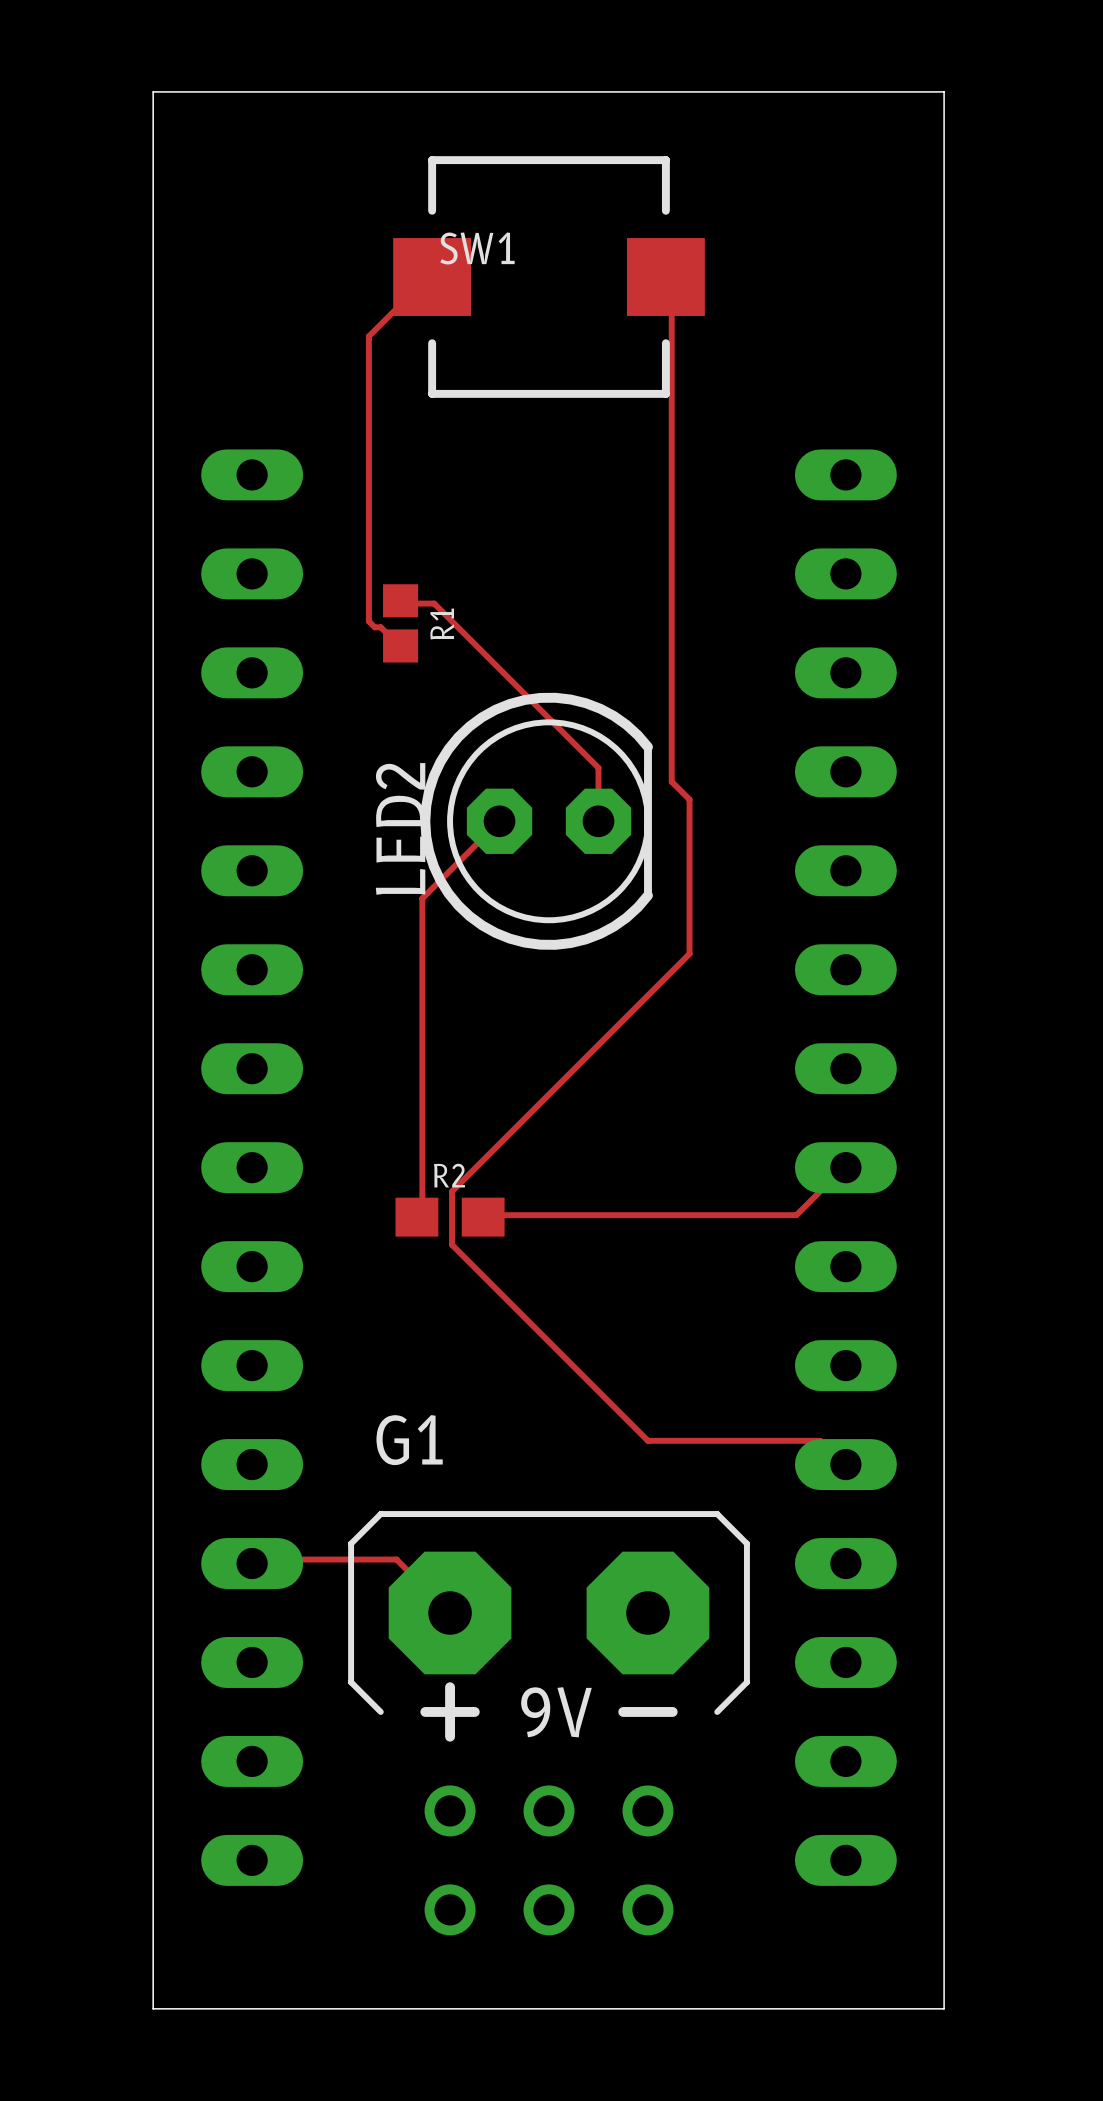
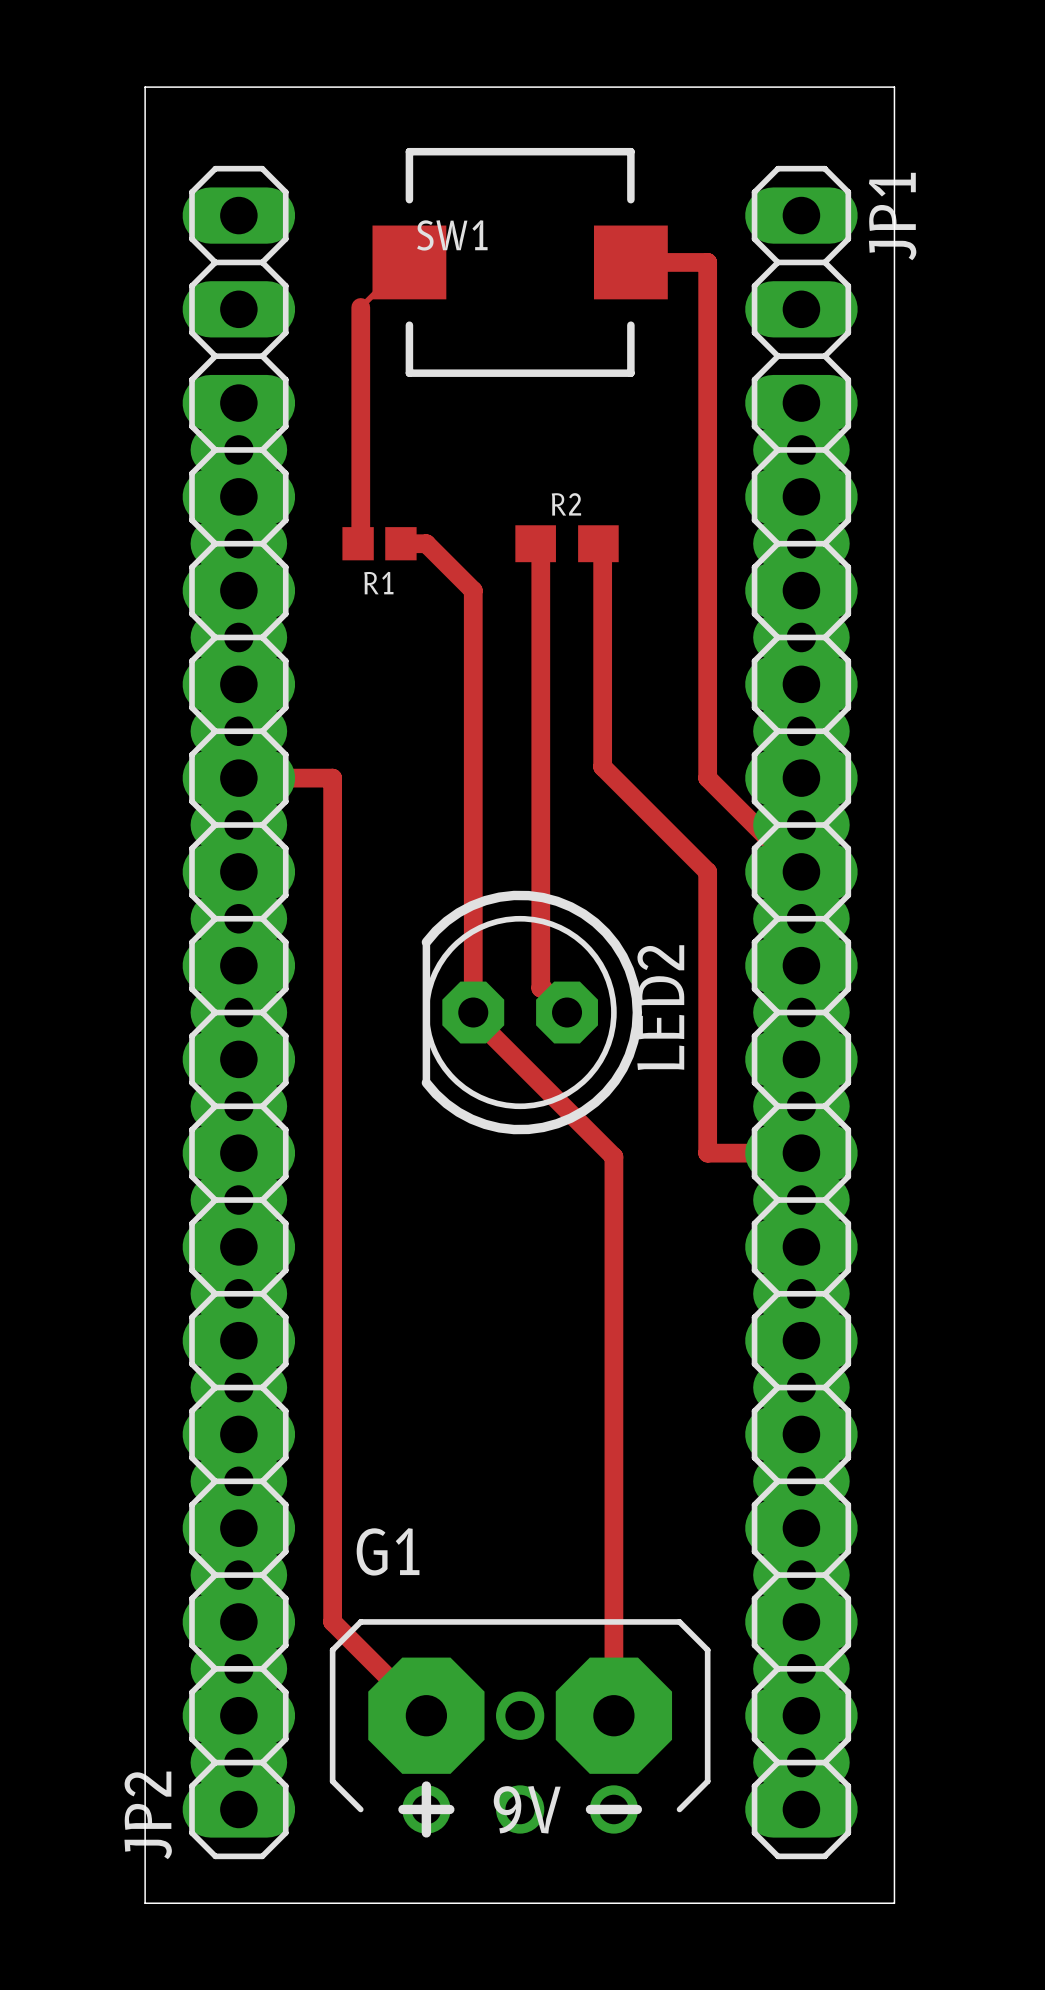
track: (671, 277) (671, 781) (689, 799) (689, 953) (452, 1191) (452, 1244) (647, 1440) (820, 1440) (845, 1464) -> (636, 262) (707, 262) (707, 778) (801, 871)
track: (380, 324) (368, 336) (368, 621) (374, 627) (380, 627) (400, 645) -> (360, 307) (360, 543) (358, 543)
track: none -> (540, 541) (535, 543) (540, 543) (540, 988) (567, 1012)
track: none -> (602, 541) (598, 543) (602, 543) (602, 766) (707, 871) (707, 1153) (801, 1153)
track: none -> (400, 543) (426, 543) (473, 590) (473, 1016) (613, 1156) (613, 1715)
track: (400, 600) (404, 603) (434, 603) (598, 767) (598, 821) -> none
R1 rotation: 0° (400, 623) -> 90° clockwise (379, 543)
R1 position: (400, 623) -> (379, 543)
track: none -> (238, 778) (332, 778) (332, 1621) (426, 1715) (422, 1713)
track: (499, 821) (422, 898) (422, 1215) (416, 1217) -> none
LED2 rotation: 0° (536, 821) -> 180° (531, 1012)
LED2 position: (536, 821) -> (531, 1012)
JP2: none -> (238, 1012)
JP1: none -> (801, 1012)
track: (845, 1167) (796, 1215) (487, 1215) (483, 1217) -> none
R2 position: (450, 1217) -> (567, 543)
track: (252, 1563) (256, 1559) (396, 1559) (450, 1612) -> none
G1 position: (549, 1626) -> (520, 1728)

